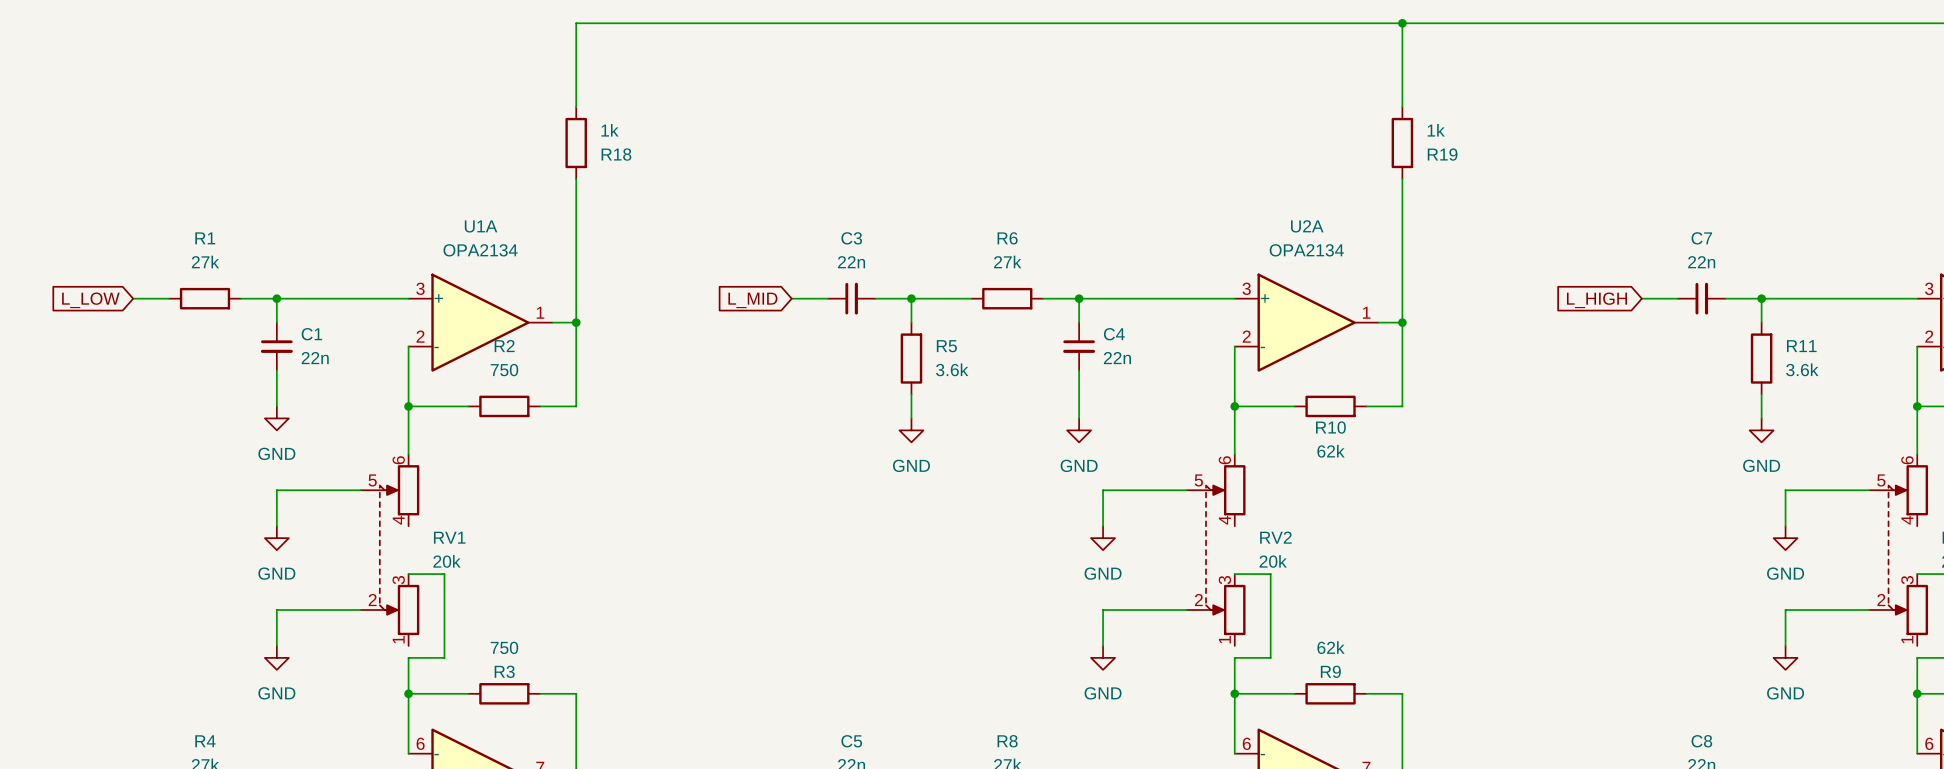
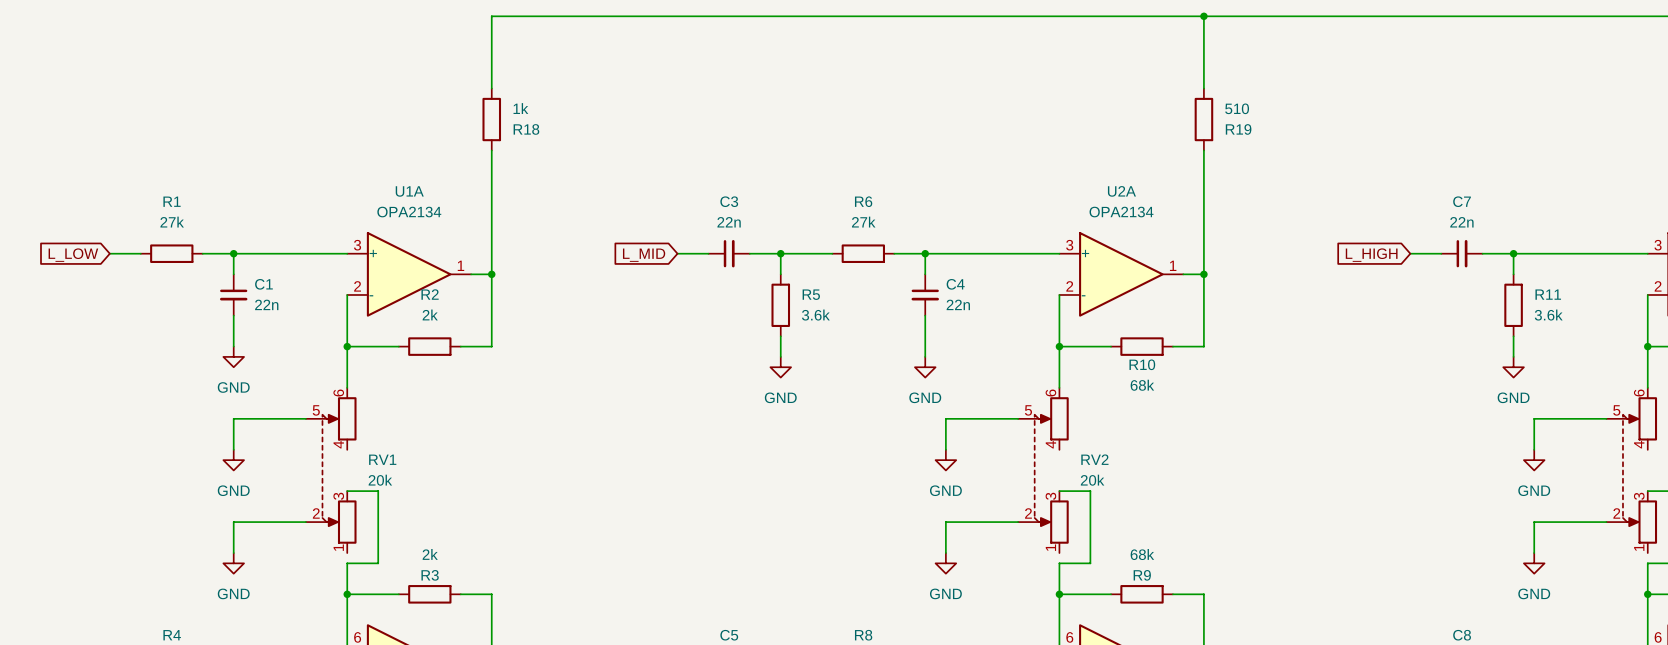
R19 value: 1k (1436, 130) -> 510 (1237, 108)
R2 value: 750 (504, 370) -> 2k (430, 314)
R10 value: 62k (1331, 451) -> 68k (1142, 385)
R3 value: 750 (504, 647) -> 2k (430, 554)
R9 value: 62k (1331, 647) -> 68k (1142, 554)

